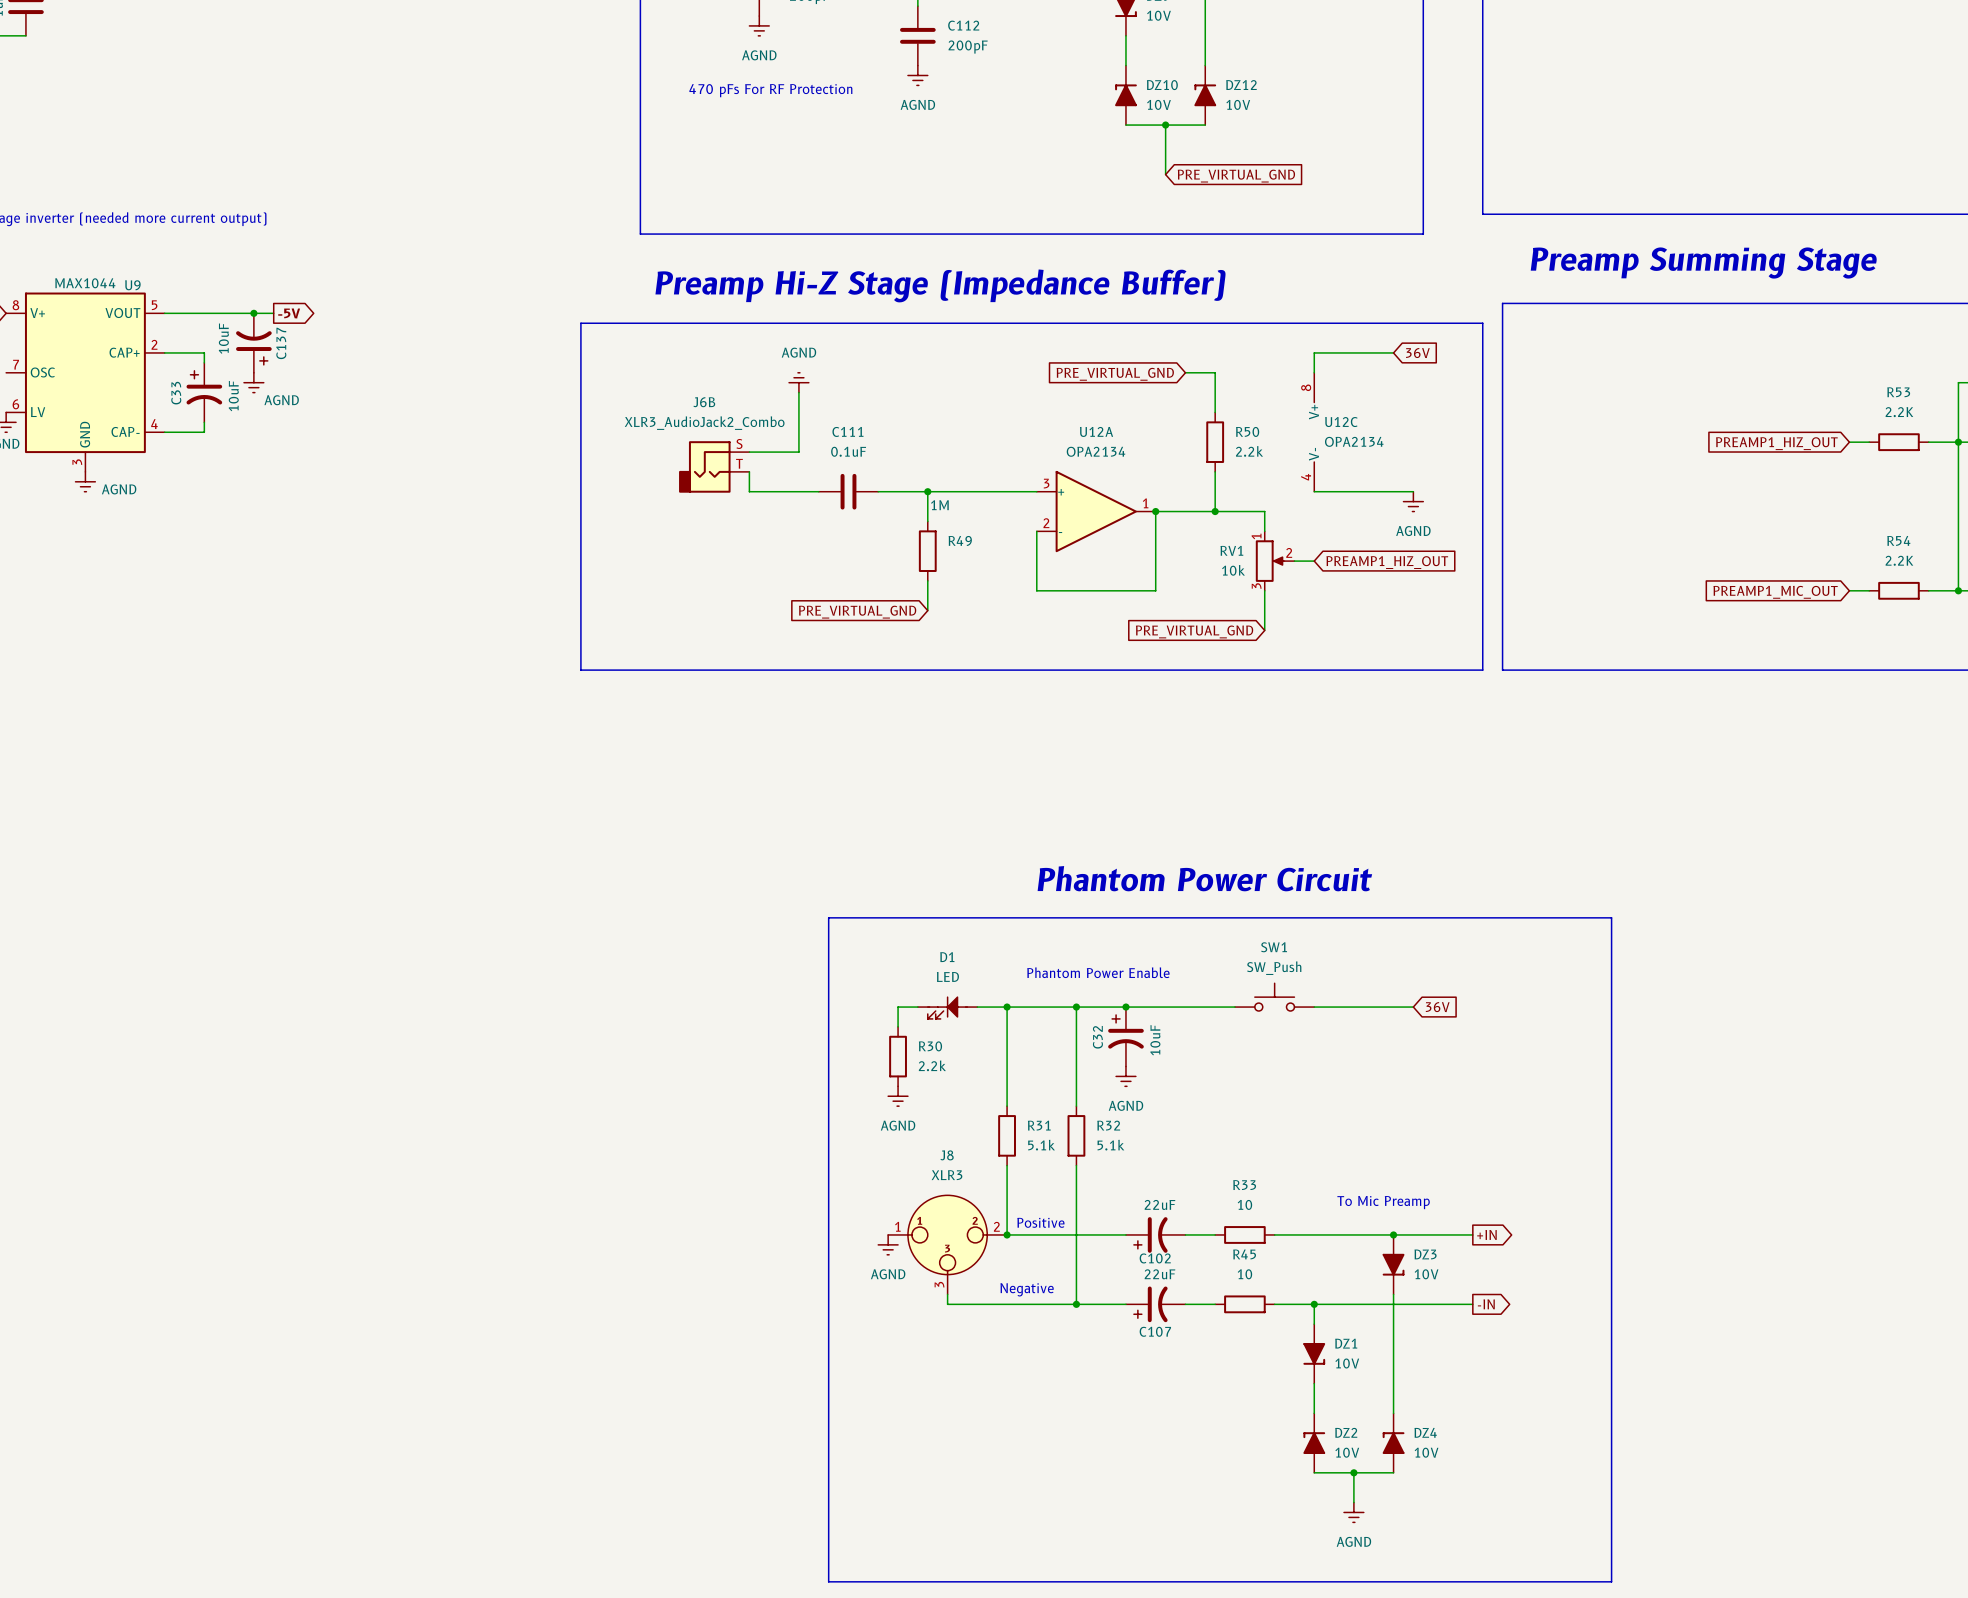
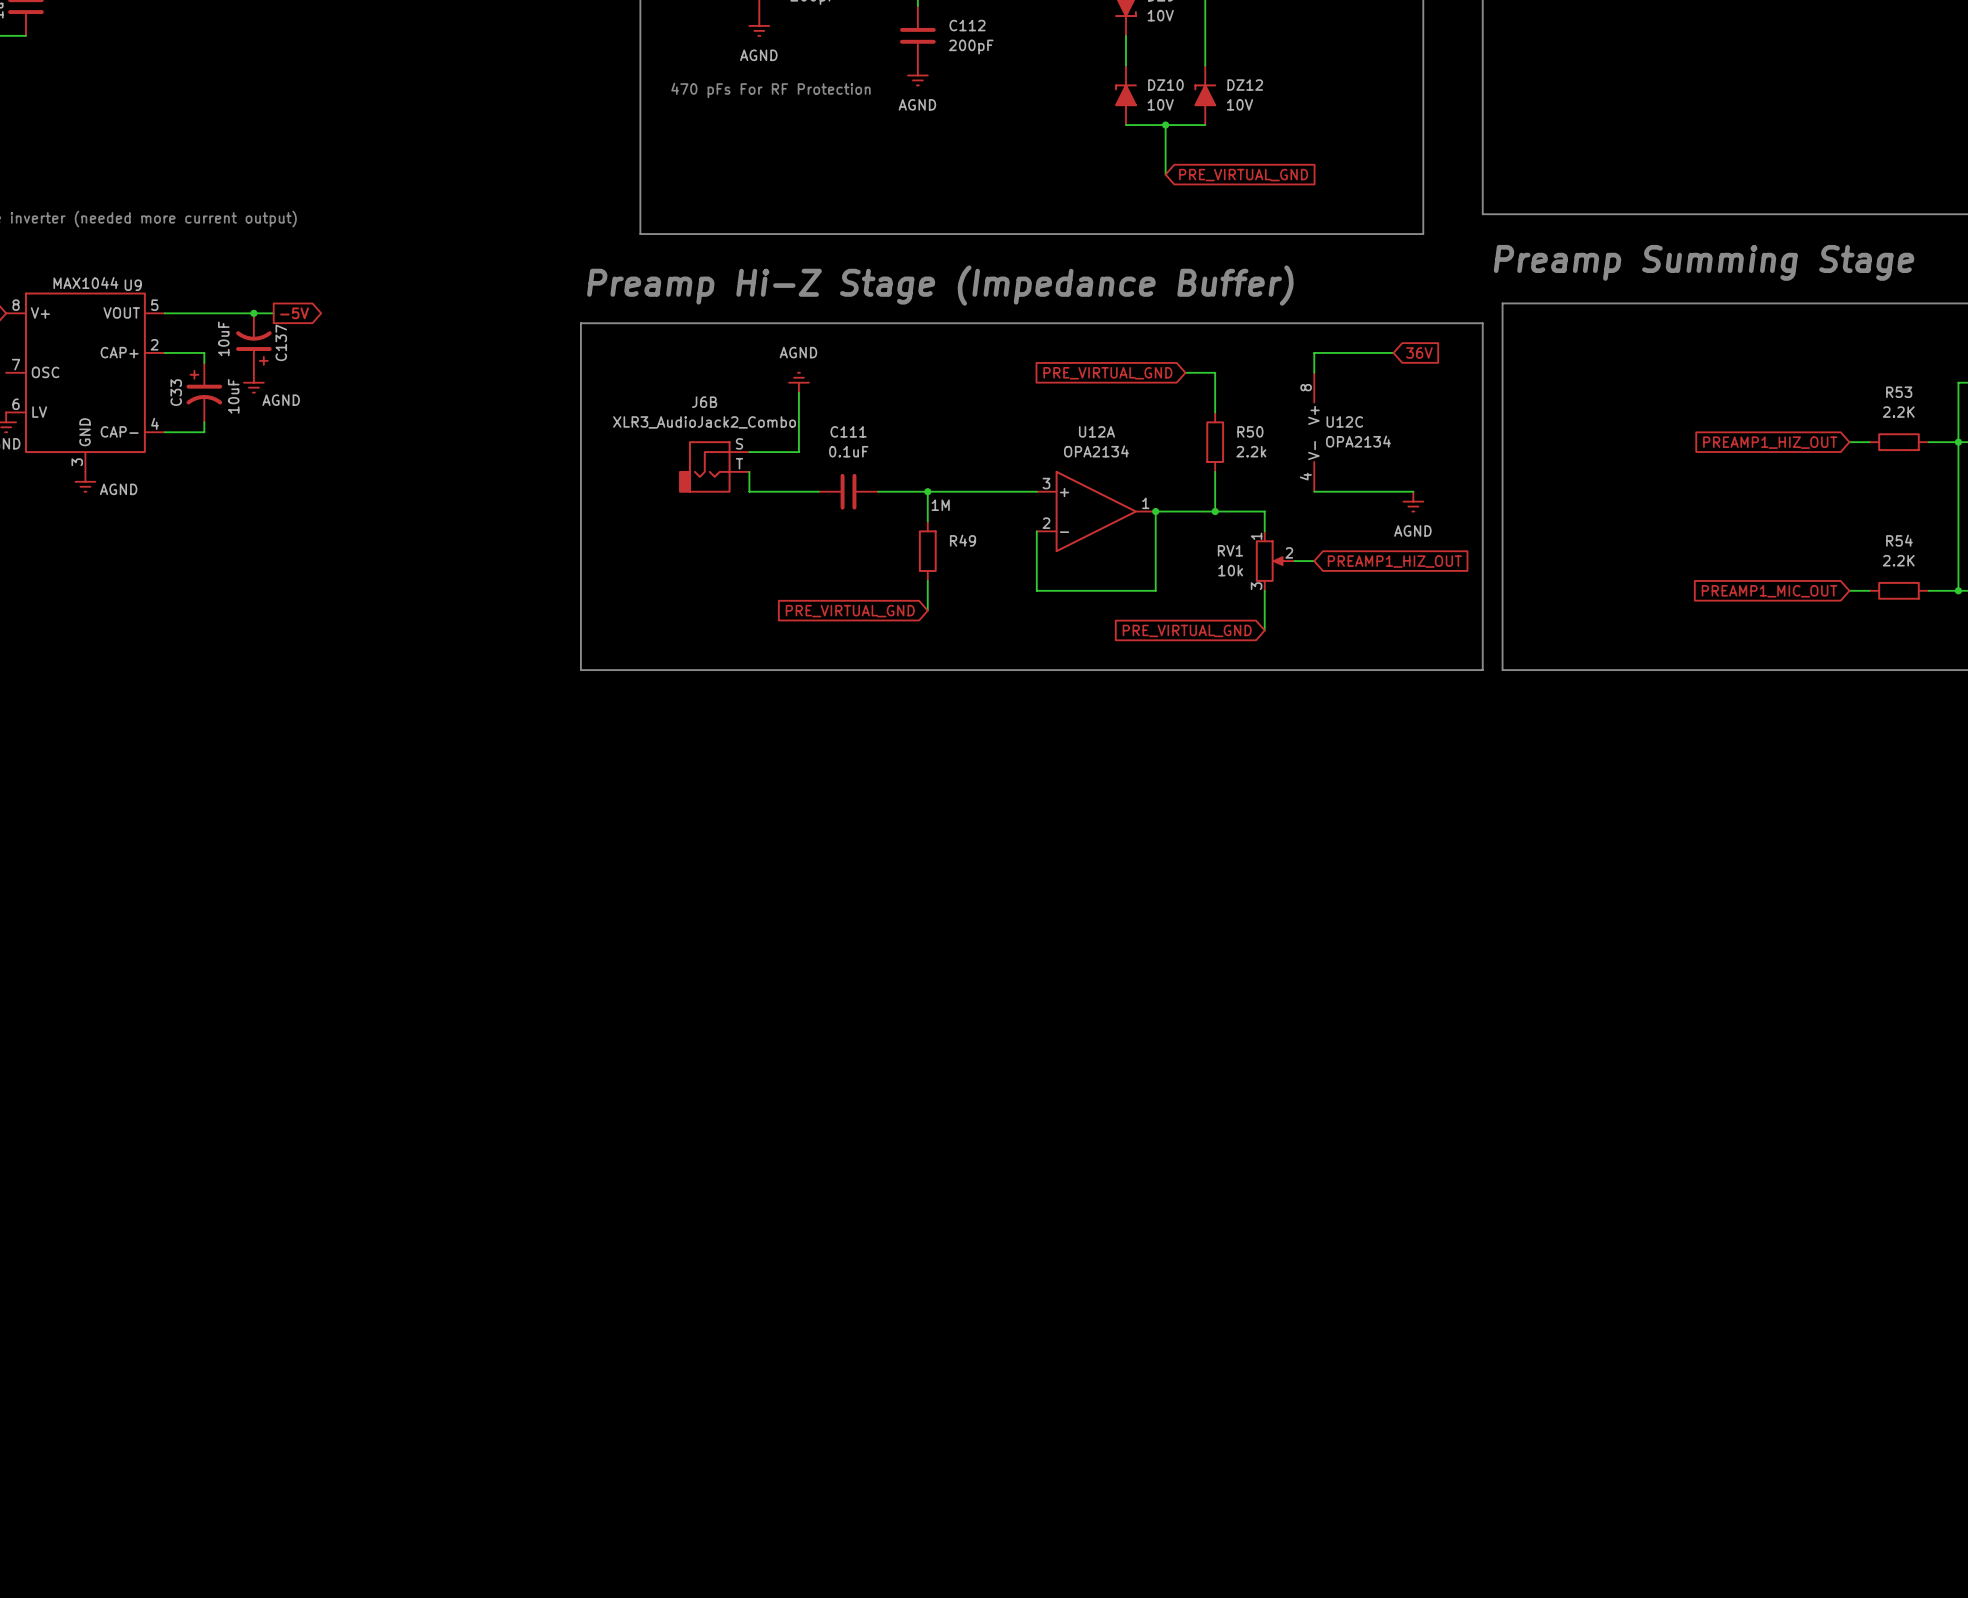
text: Phantom Power Circuit (1204, 878) -> none
line: (828, 917) (1611, 917) (1611, 1581) (828, 1581) (828, 917) -> none
text: Phantom Power Enable (1098, 972) -> none
SW1: SW_Push (1274, 997) -> none
wire: (917, 1007) (898, 1007) (898, 1026) -> none
wire: (977, 1007) (1234, 1007) -> none
wire: (1007, 1007) (1007, 1106) -> none
junction: (1007, 1007) -> none
wire: (1076, 1007) (1076, 1106) -> none
junction: (1076, 1007) -> none
junction: (1125, 1007) -> none
wire: (1314, 1007) (1413, 1007) -> none
global label: 36V (1437, 1007) -> none
D1: LED (947, 1008) -> none
C32: 10uF (1125, 1036) -> none
R30: 2.2k (898, 1056) -> none
power symbol: AGND (1125, 1076) -> none
power symbol: AGND (898, 1096) -> none
R31: 5.1k (1007, 1135) -> none
R32: 5.1k (1076, 1135) -> none
wire: (1007, 1165) (1007, 1234) (1125, 1234) -> none
wire: (1076, 1165) (1076, 1304) -> none
text: To Mic Preamp (1383, 1202) -> none
text: Positive (1040, 1222) -> none
junction: (1007, 1234) -> none
C102: 22uF (1155, 1234) -> none
wire: (1185, 1234) (1215, 1234) -> none
R33: 10 (1244, 1234) -> none
wire: (1274, 1234) (1472, 1234) -> none
junction: (1393, 1234) -> none
global label: +IN (1486, 1234) -> none
power symbol: AGND (888, 1244) -> none
J8: XLR3 (947, 1244) -> none
DZ3: 10V (1393, 1264) -> none
text: Negative (1027, 1289) -> none
wire: (947, 1294) (947, 1304) (1125, 1304) -> none
wire: (1393, 1294) (1393, 1413) -> none
junction: (1076, 1304) -> none
C107: 22uF (1155, 1304) -> none
wire: (1185, 1304) (1215, 1304) -> none
R45: 10 (1244, 1304) -> none
wire: (1274, 1304) (1472, 1304) -> none
wire: (1314, 1304) (1314, 1324) -> none
junction: (1314, 1304) -> none
global label: -IN (1486, 1304) -> none
DZ1: 10V (1314, 1353) -> none
wire: (1314, 1383) (1314, 1413) -> none
DZ2: 10V (1314, 1443) -> none
DZ4: 10V (1393, 1443) -> none
wire: (1314, 1472) (1393, 1472) -> none
wire: (1353, 1472) (1353, 1502) -> none
junction: (1353, 1472) -> none
power symbol: AGND (1353, 1512) -> none

